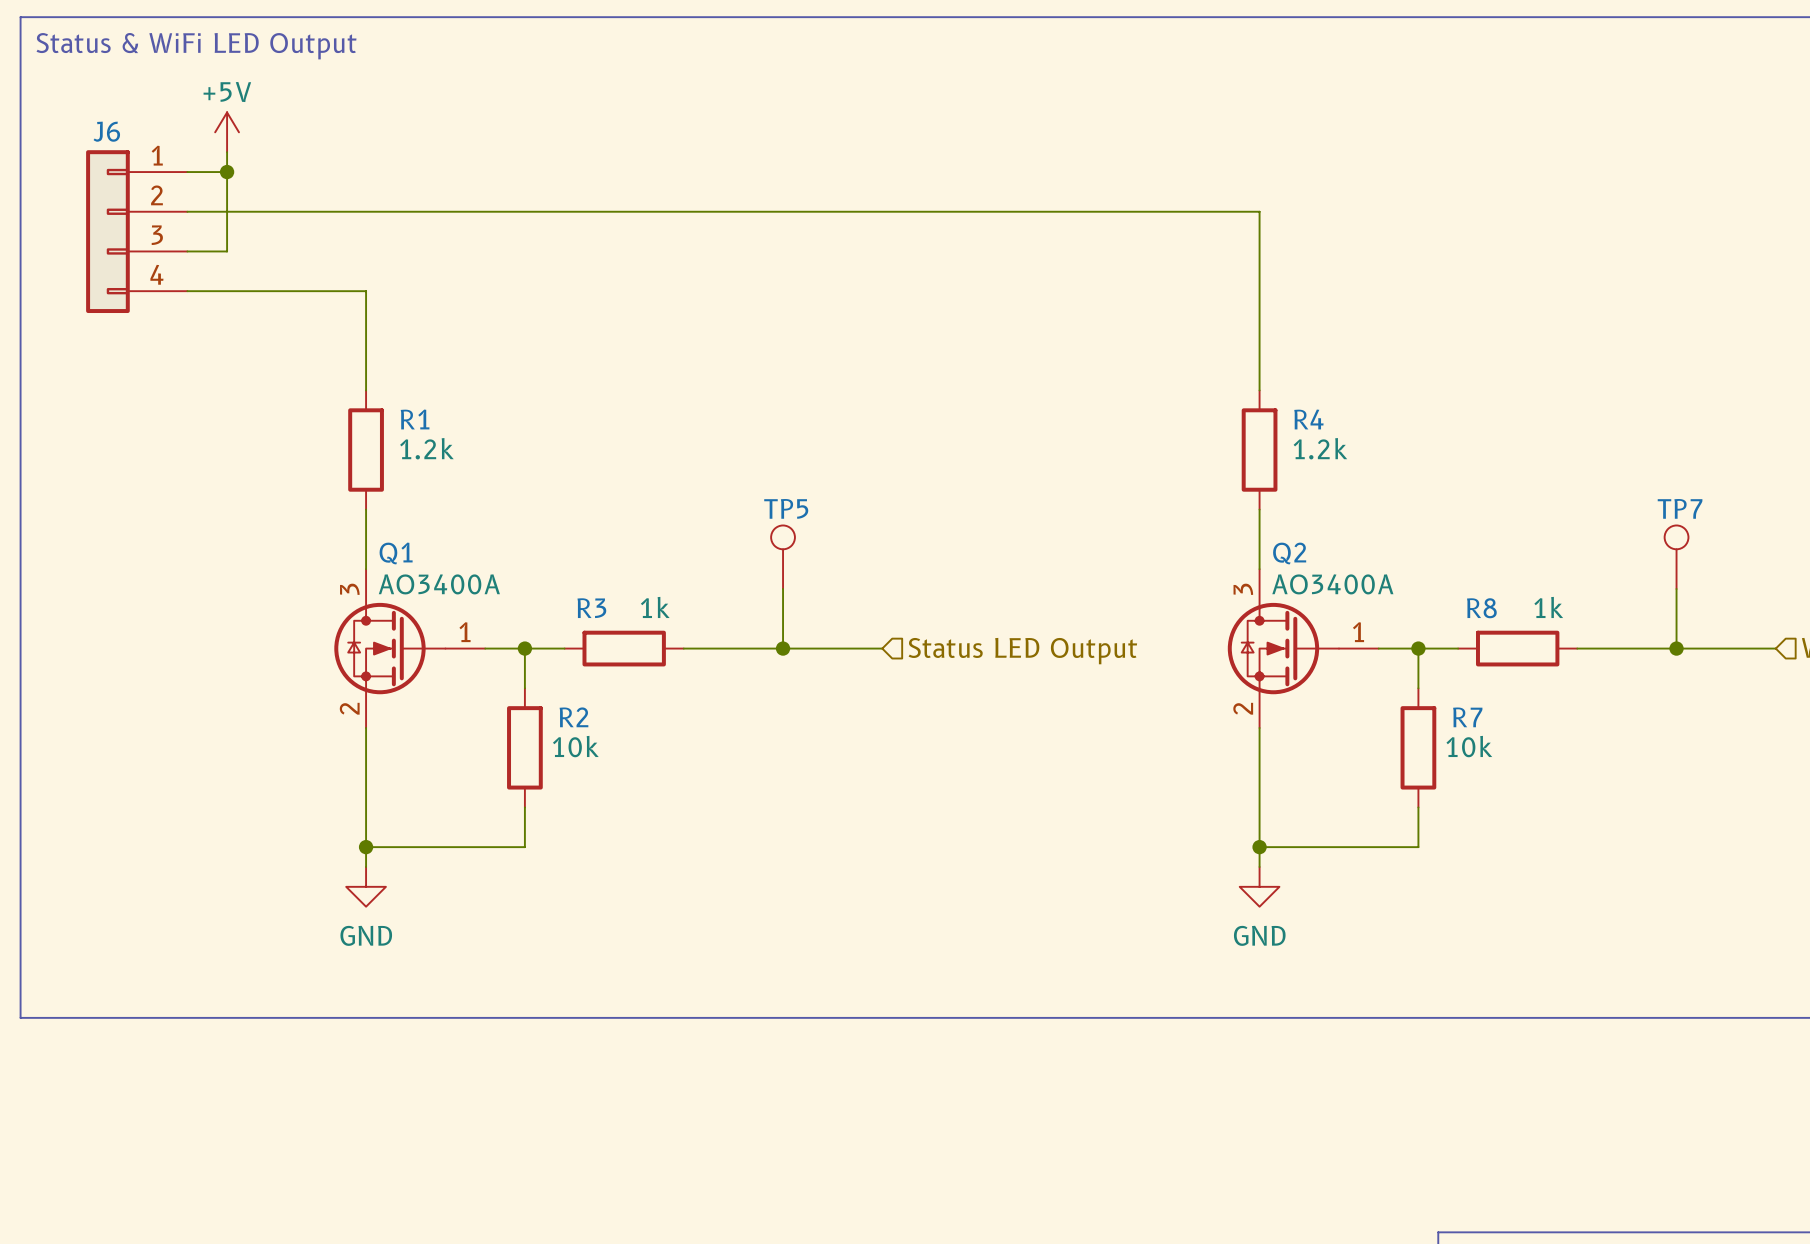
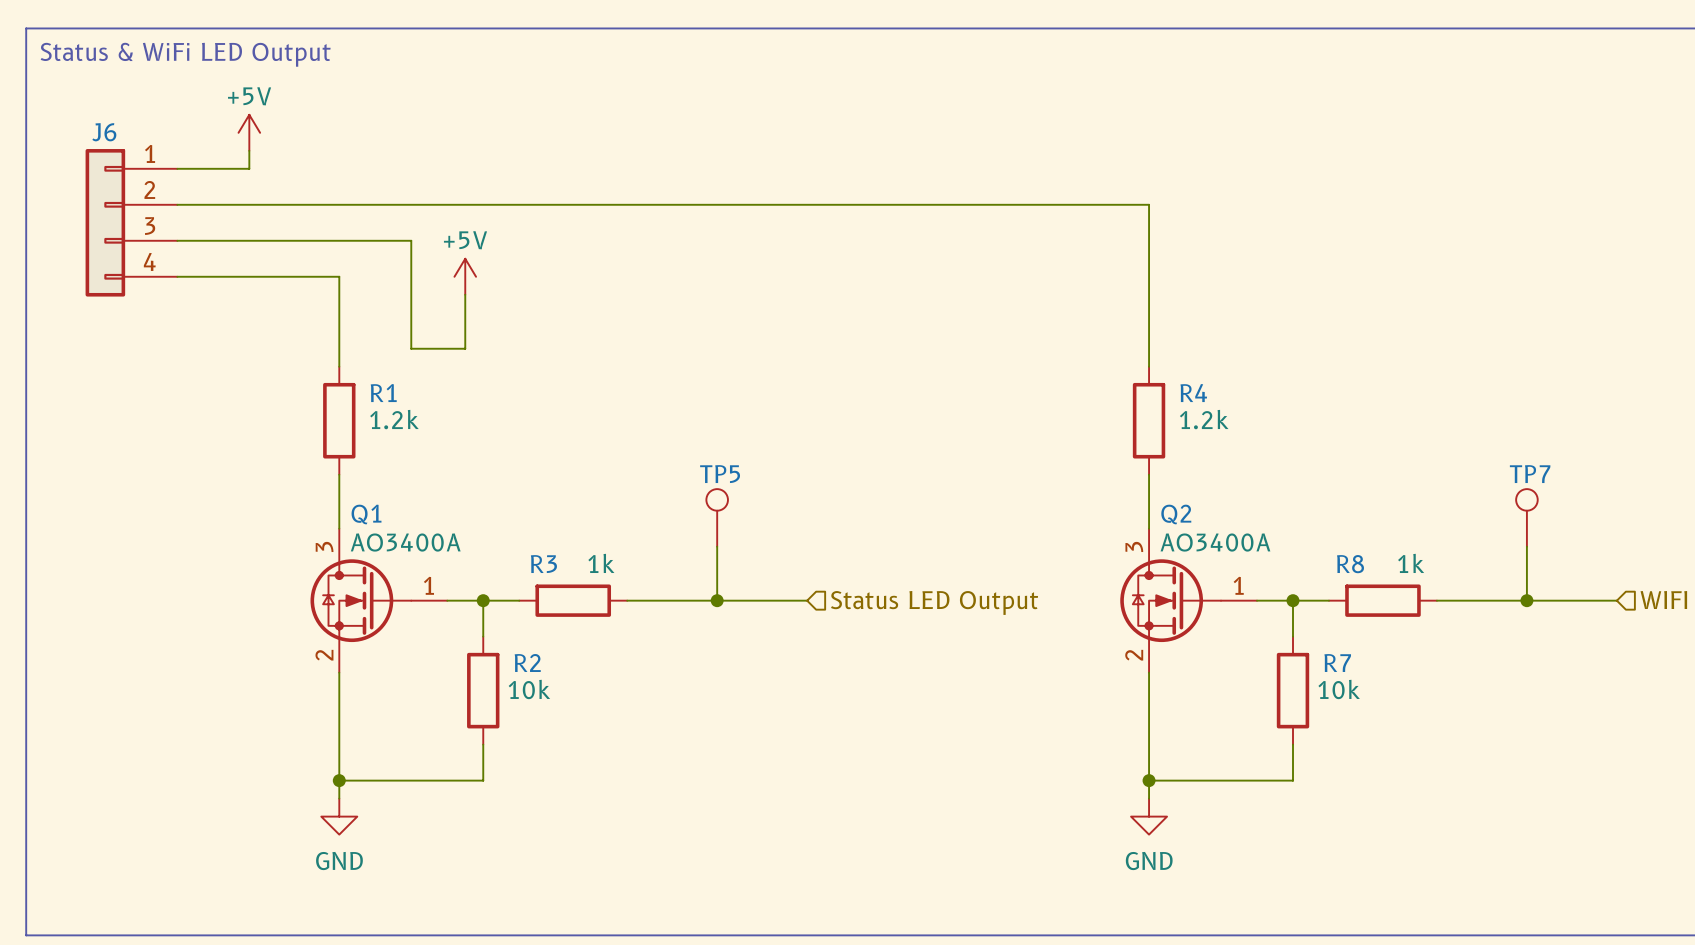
power symbol position: +5V (227, 132) -> +5V (249, 132)
wire: (227, 152) (227, 251) -> (465, 294) (465, 348) (411, 348) (411, 240) (213, 240)
wire: none -> (249, 150) (249, 168) (213, 168)
junction: (227, 172) -> none
power symbol: none -> +5V (465, 276)

